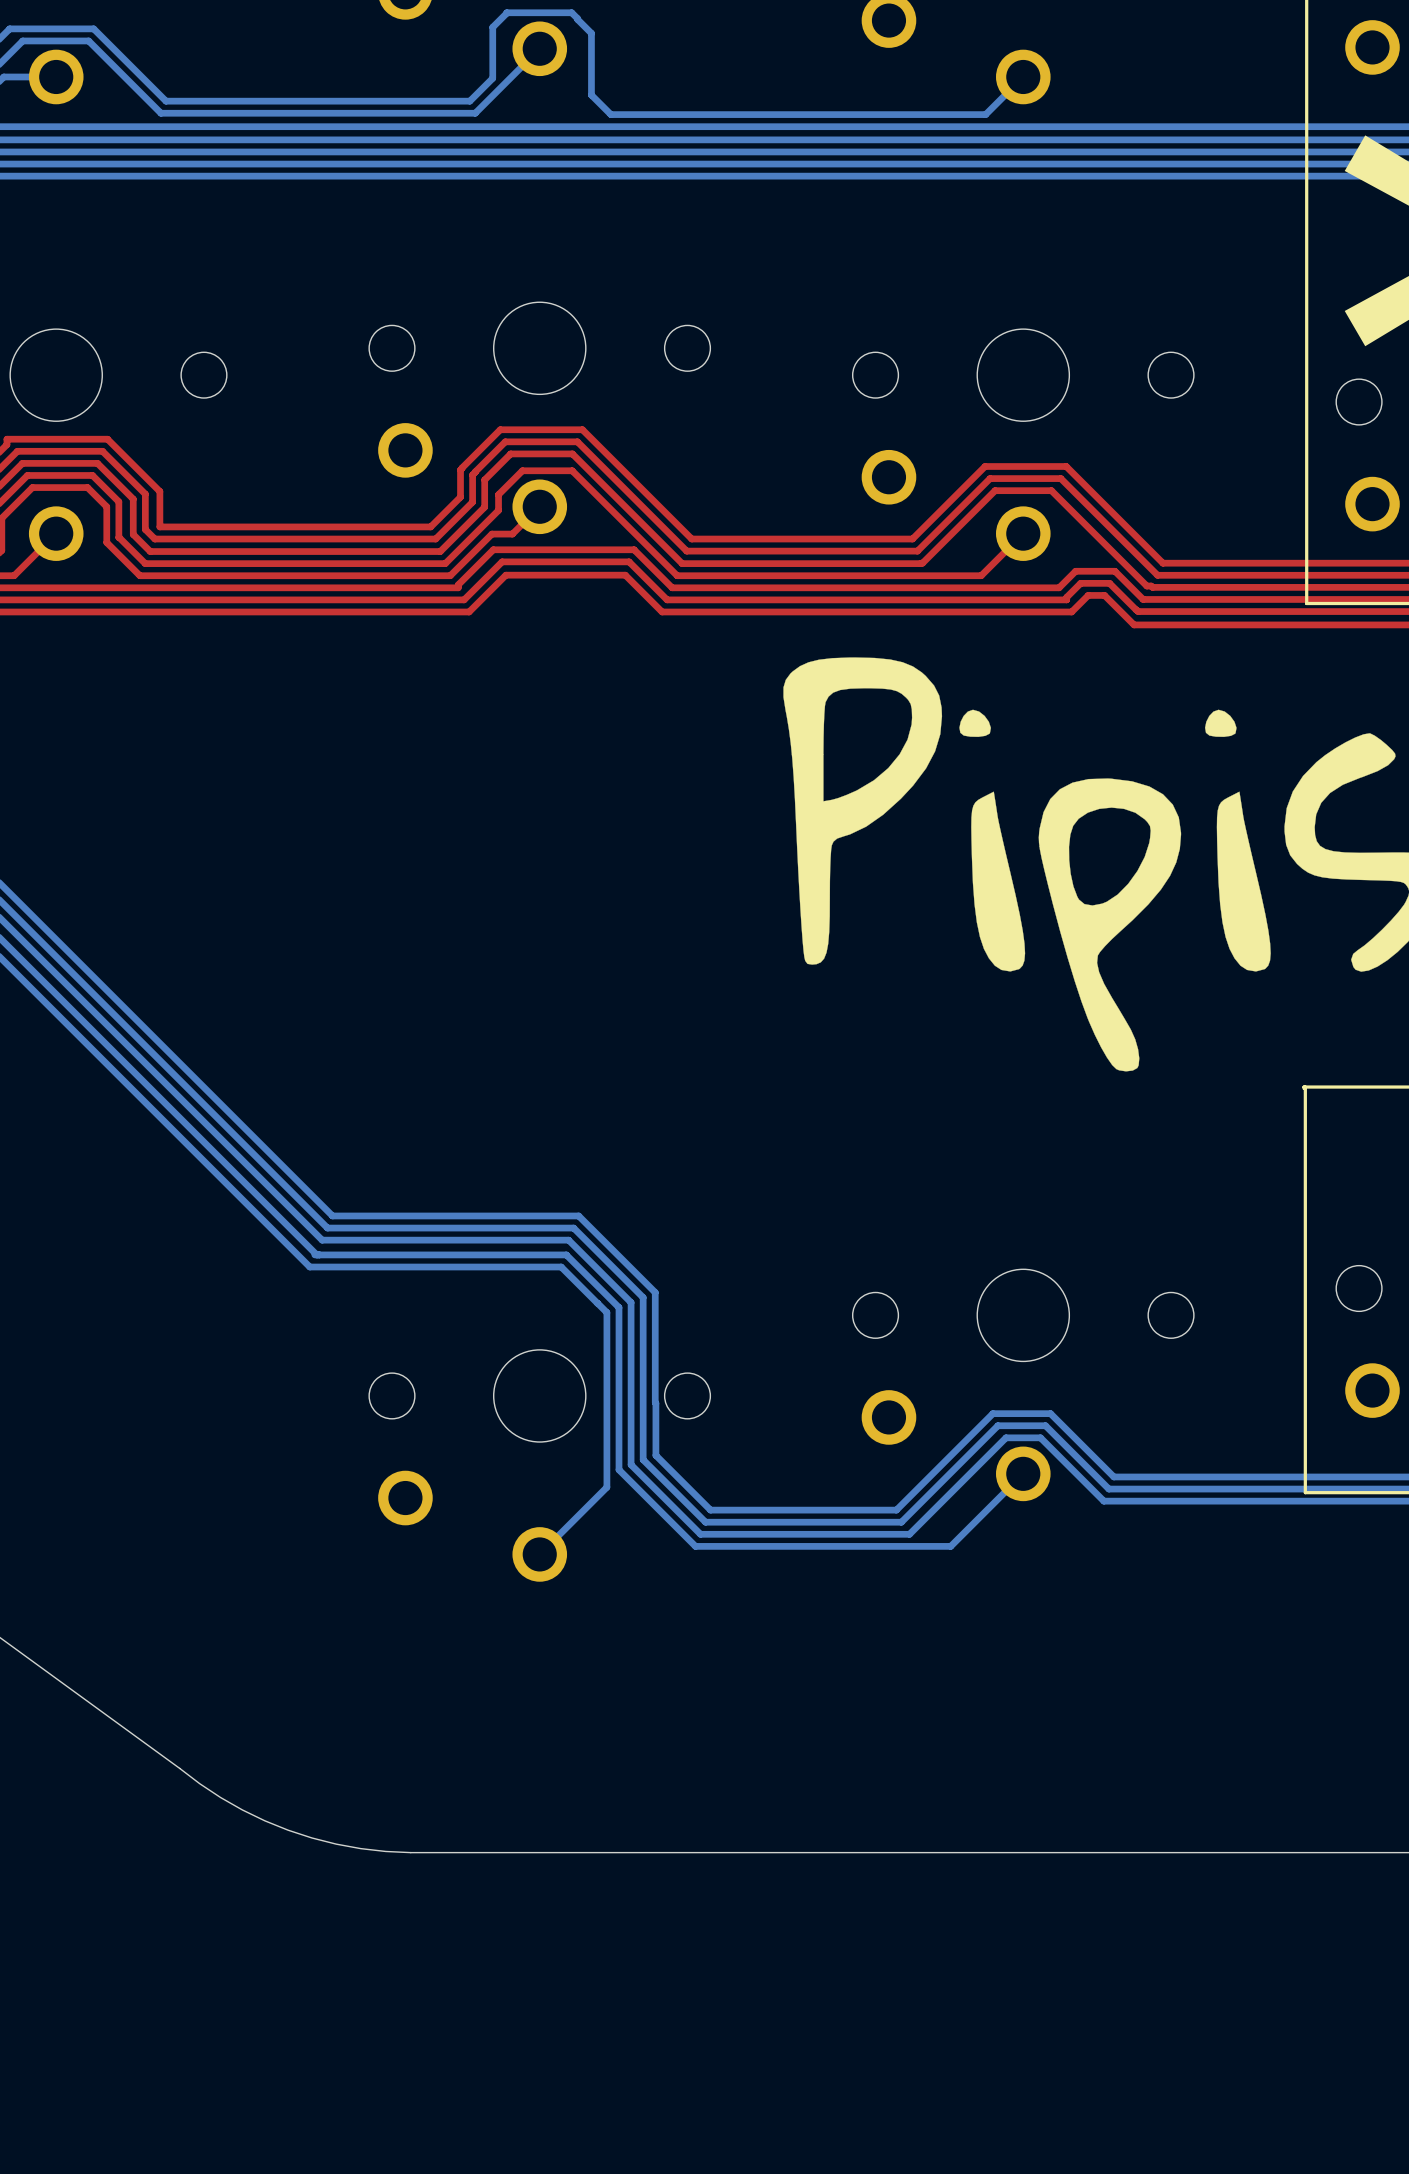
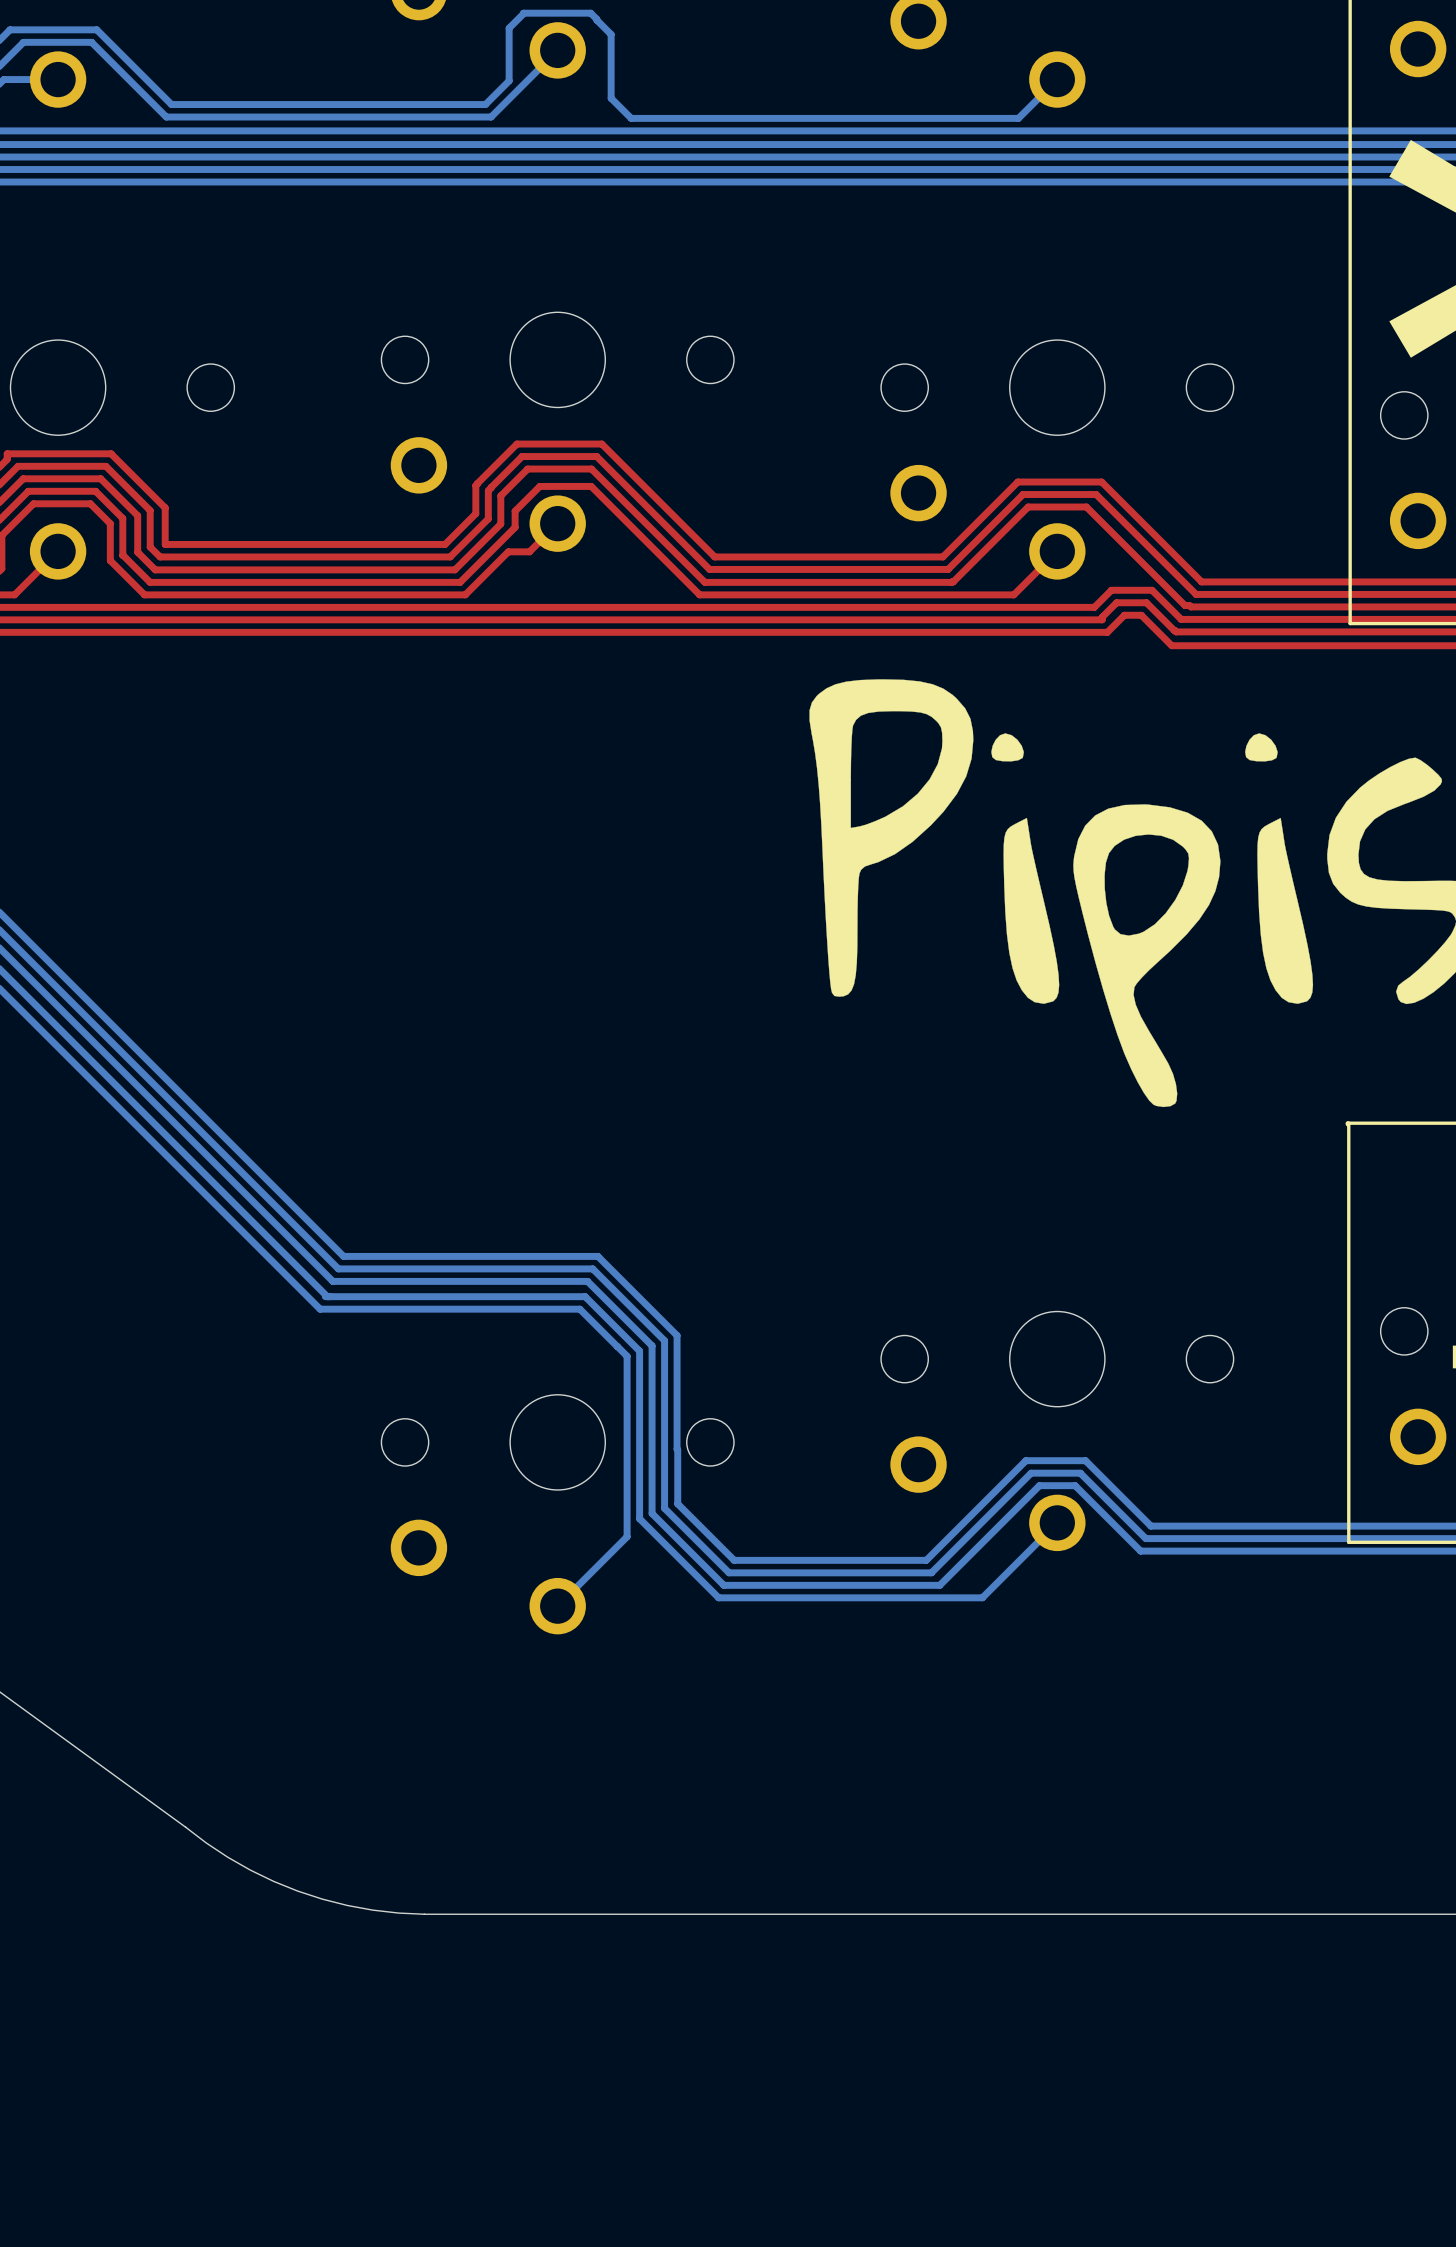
top track: (458, 587) (458, 584) (493, 549) (634, 549) (672, 587) -> (473, 607) (694, 607)
top track: (464, 599) (502, 561) (629, 561) (667, 599) -> (479, 619) (689, 619)
top track: (469, 611) (505, 575) (625, 575) (662, 611) -> (484, 632) (684, 632)

